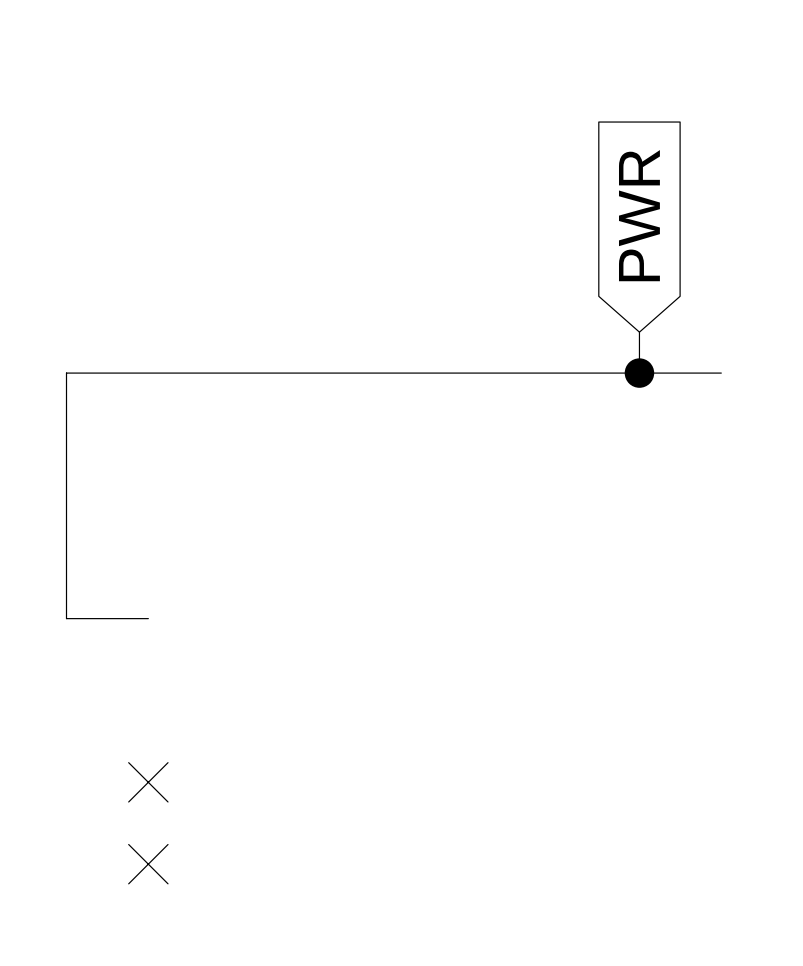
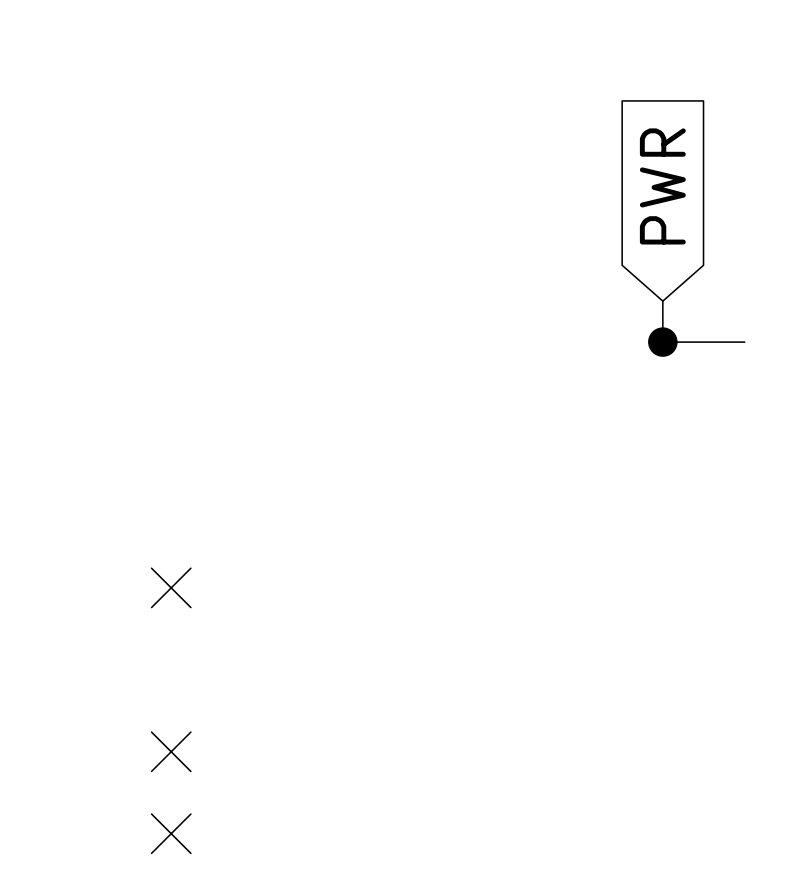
wire: (639, 373) (66, 373) (66, 618) (148, 618) -> none
no-connect mark: none -> (171, 587)

